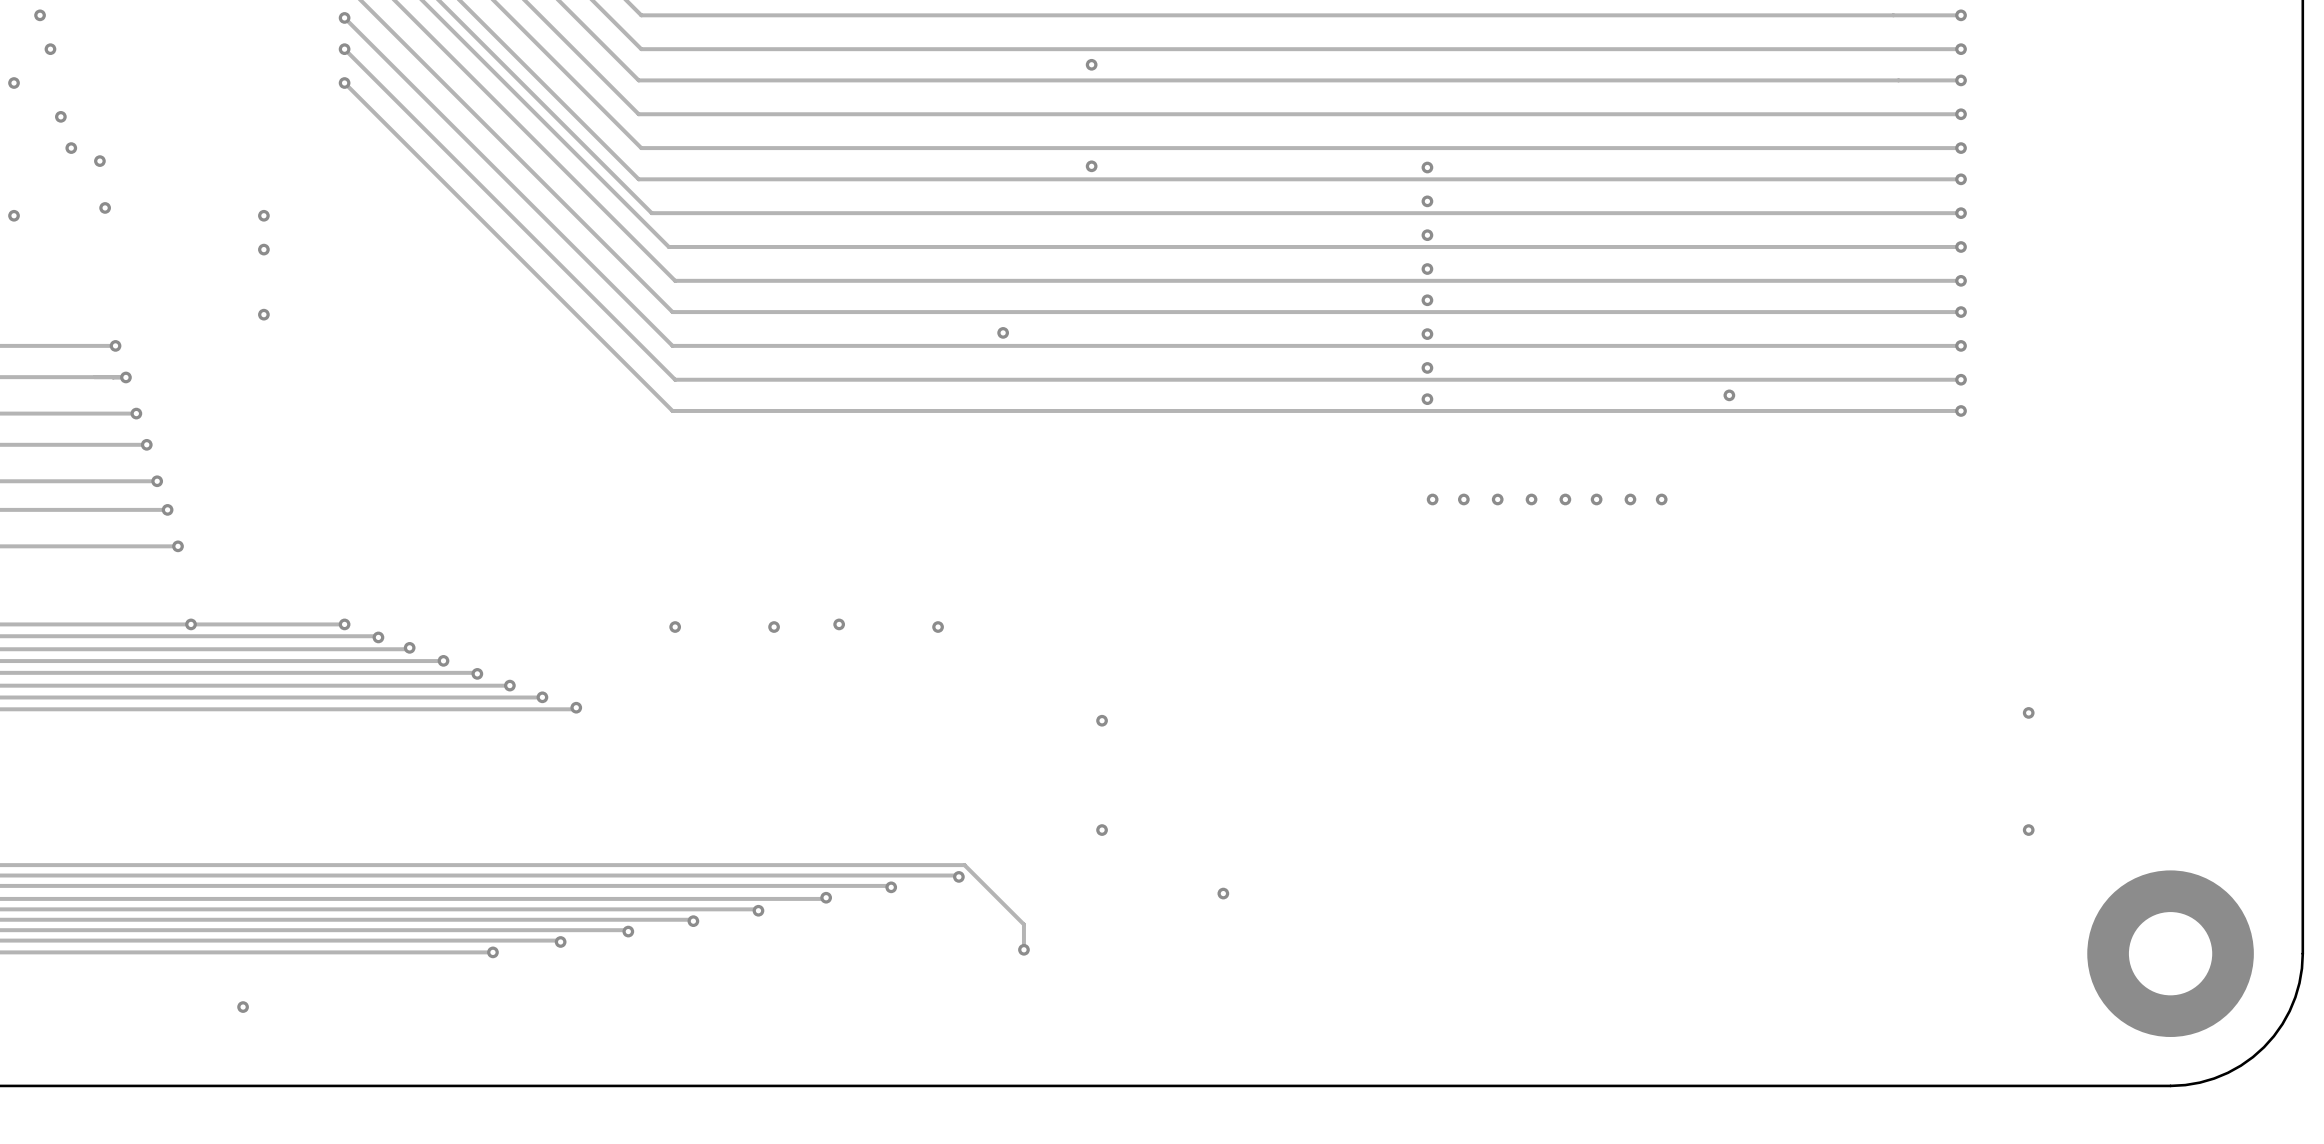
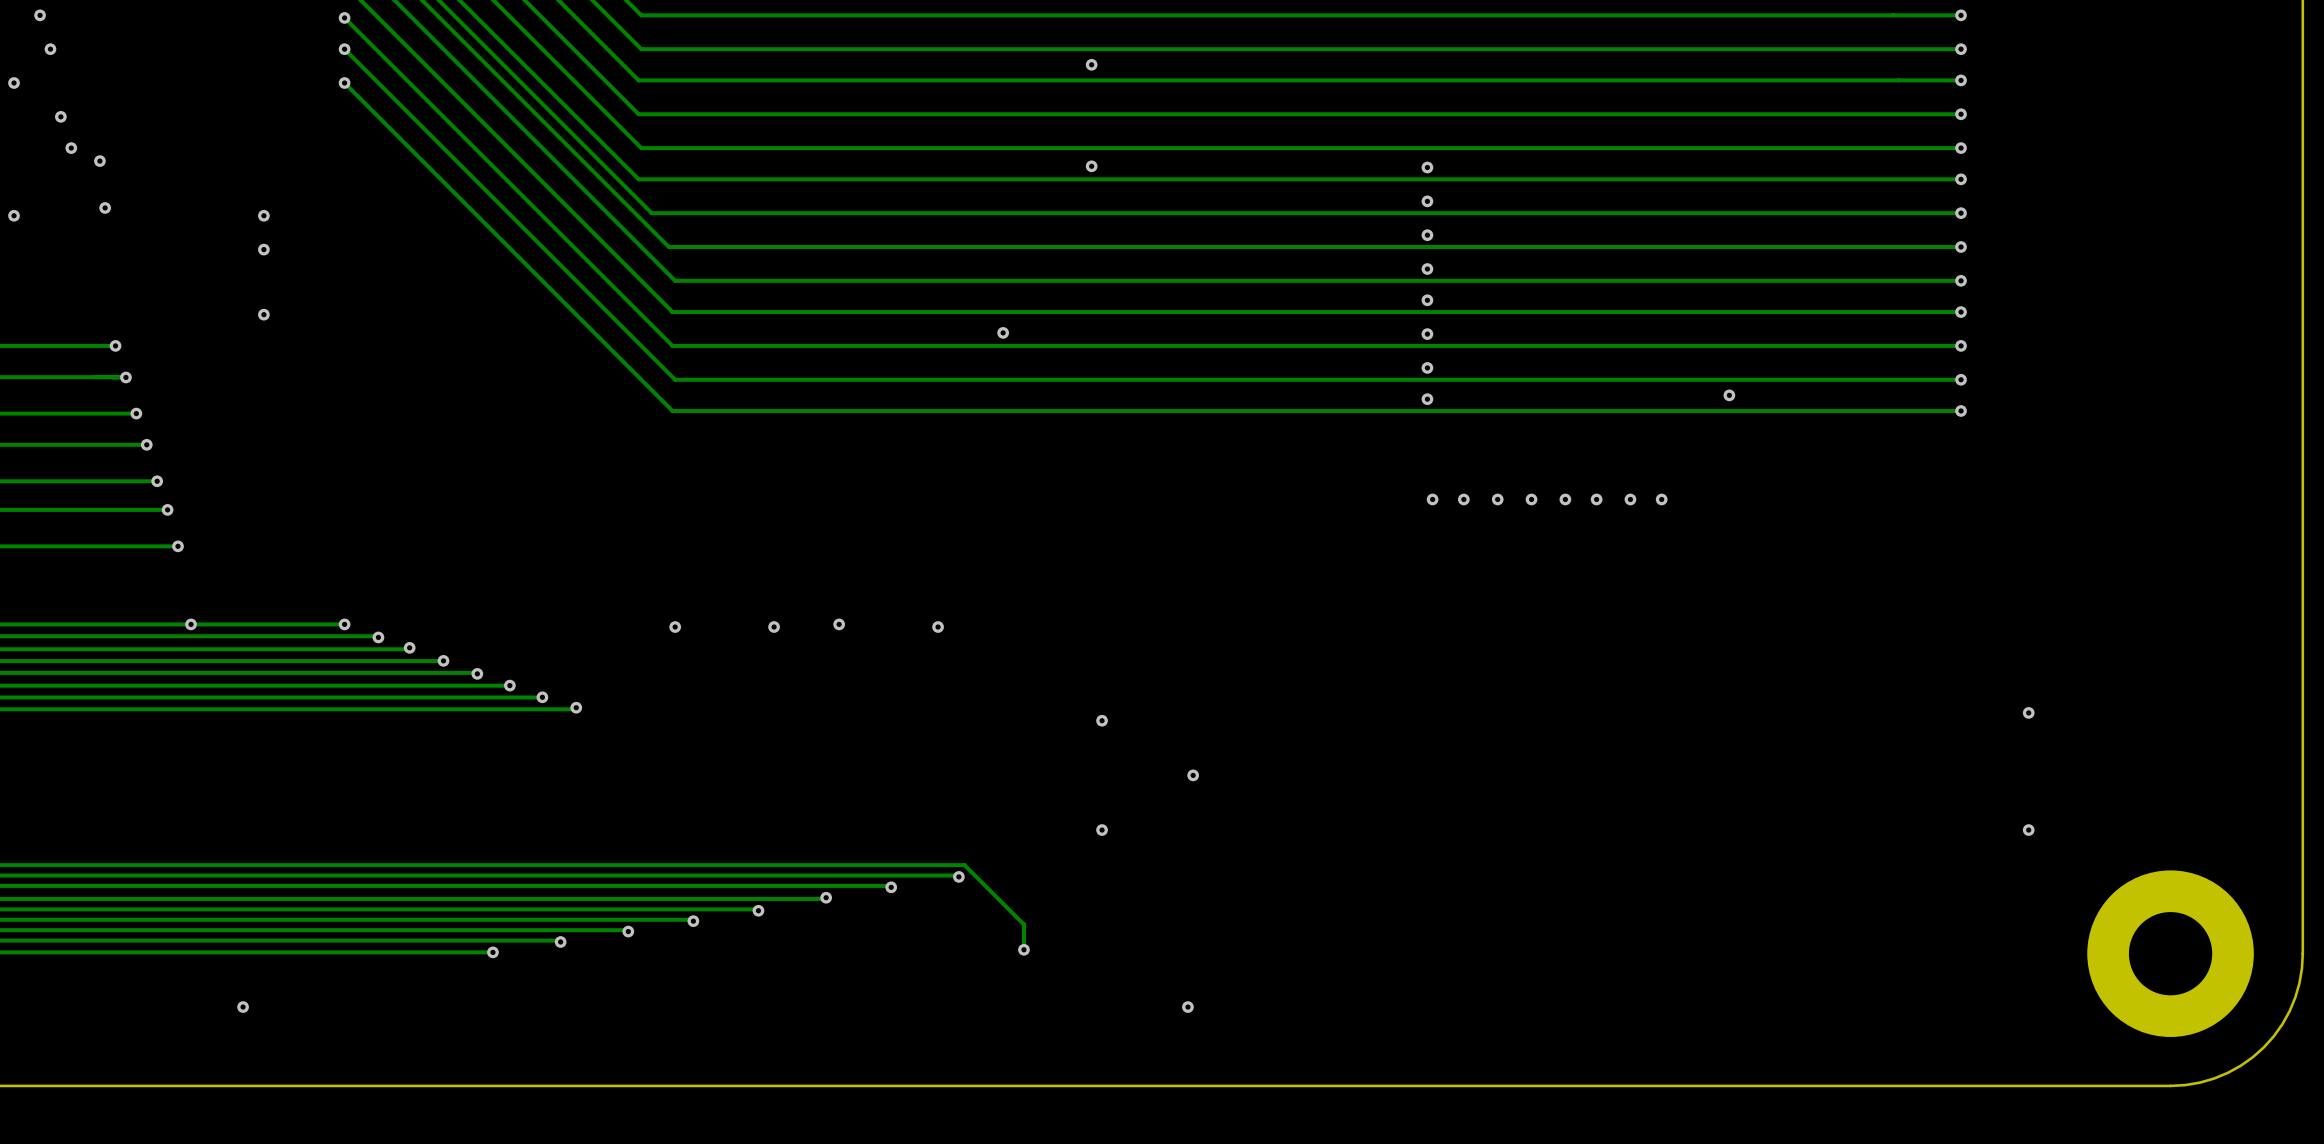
via: none -> (1193, 775)
via: (1223, 893) -> none
via: none -> (1187, 1007)

